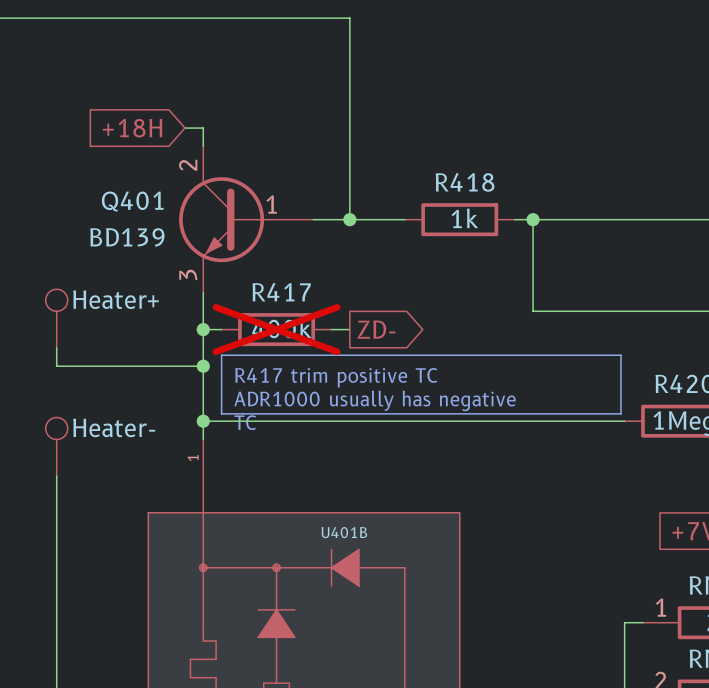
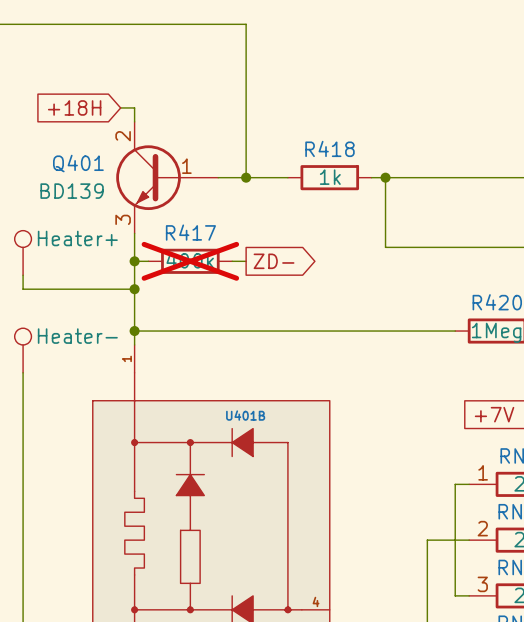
line: (221, 355) (620, 355) (620, 413) (221, 413) (221, 355) -> none
text: R417 trim positive TC (336, 377) -> none
text: ADR1000 usually has negative (374, 400) -> none
text: TC (245, 422) -> none

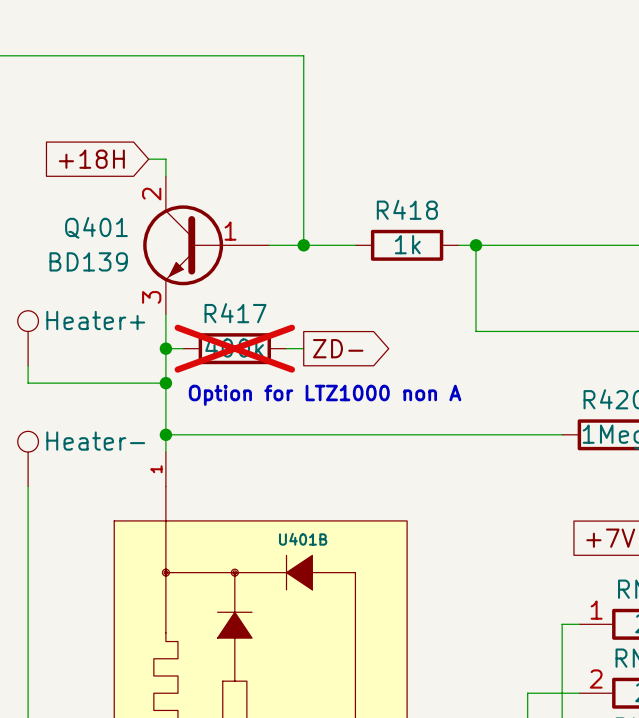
text: none -> Option for LTZ1000 non A (325, 395)

